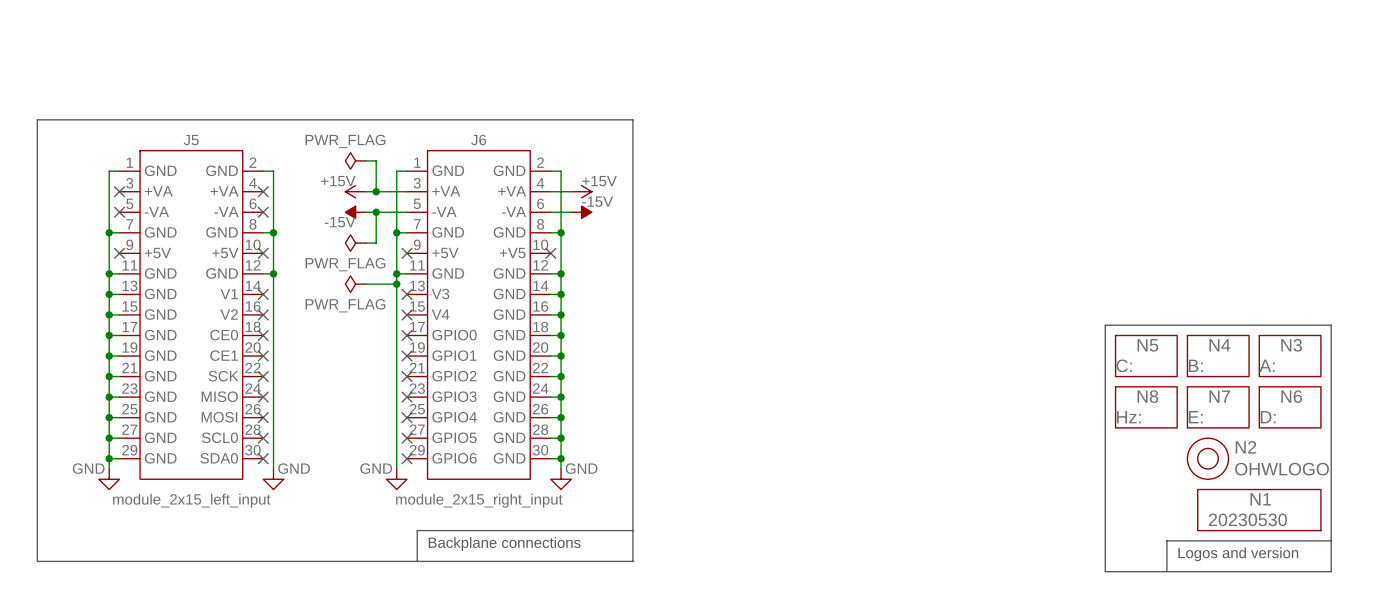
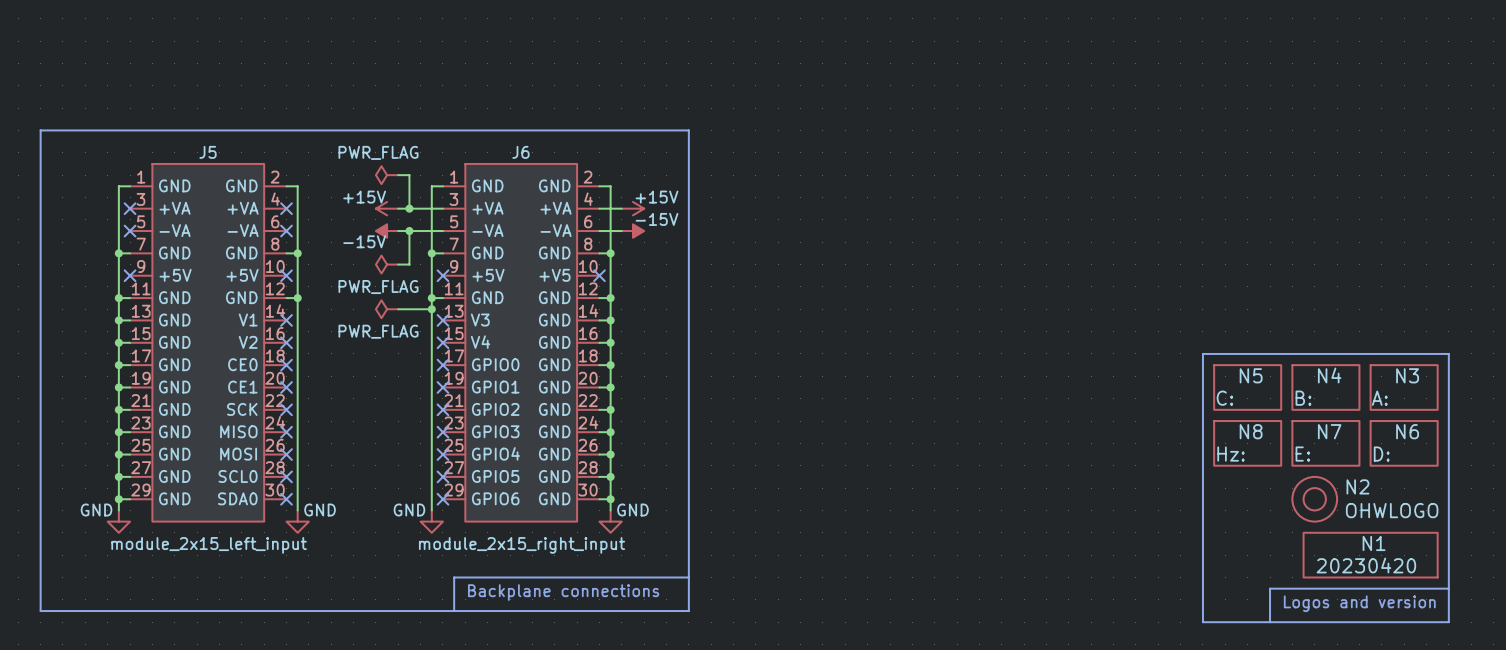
N1 value: 20230530 (1247, 519) -> 20230420 (1366, 565)

